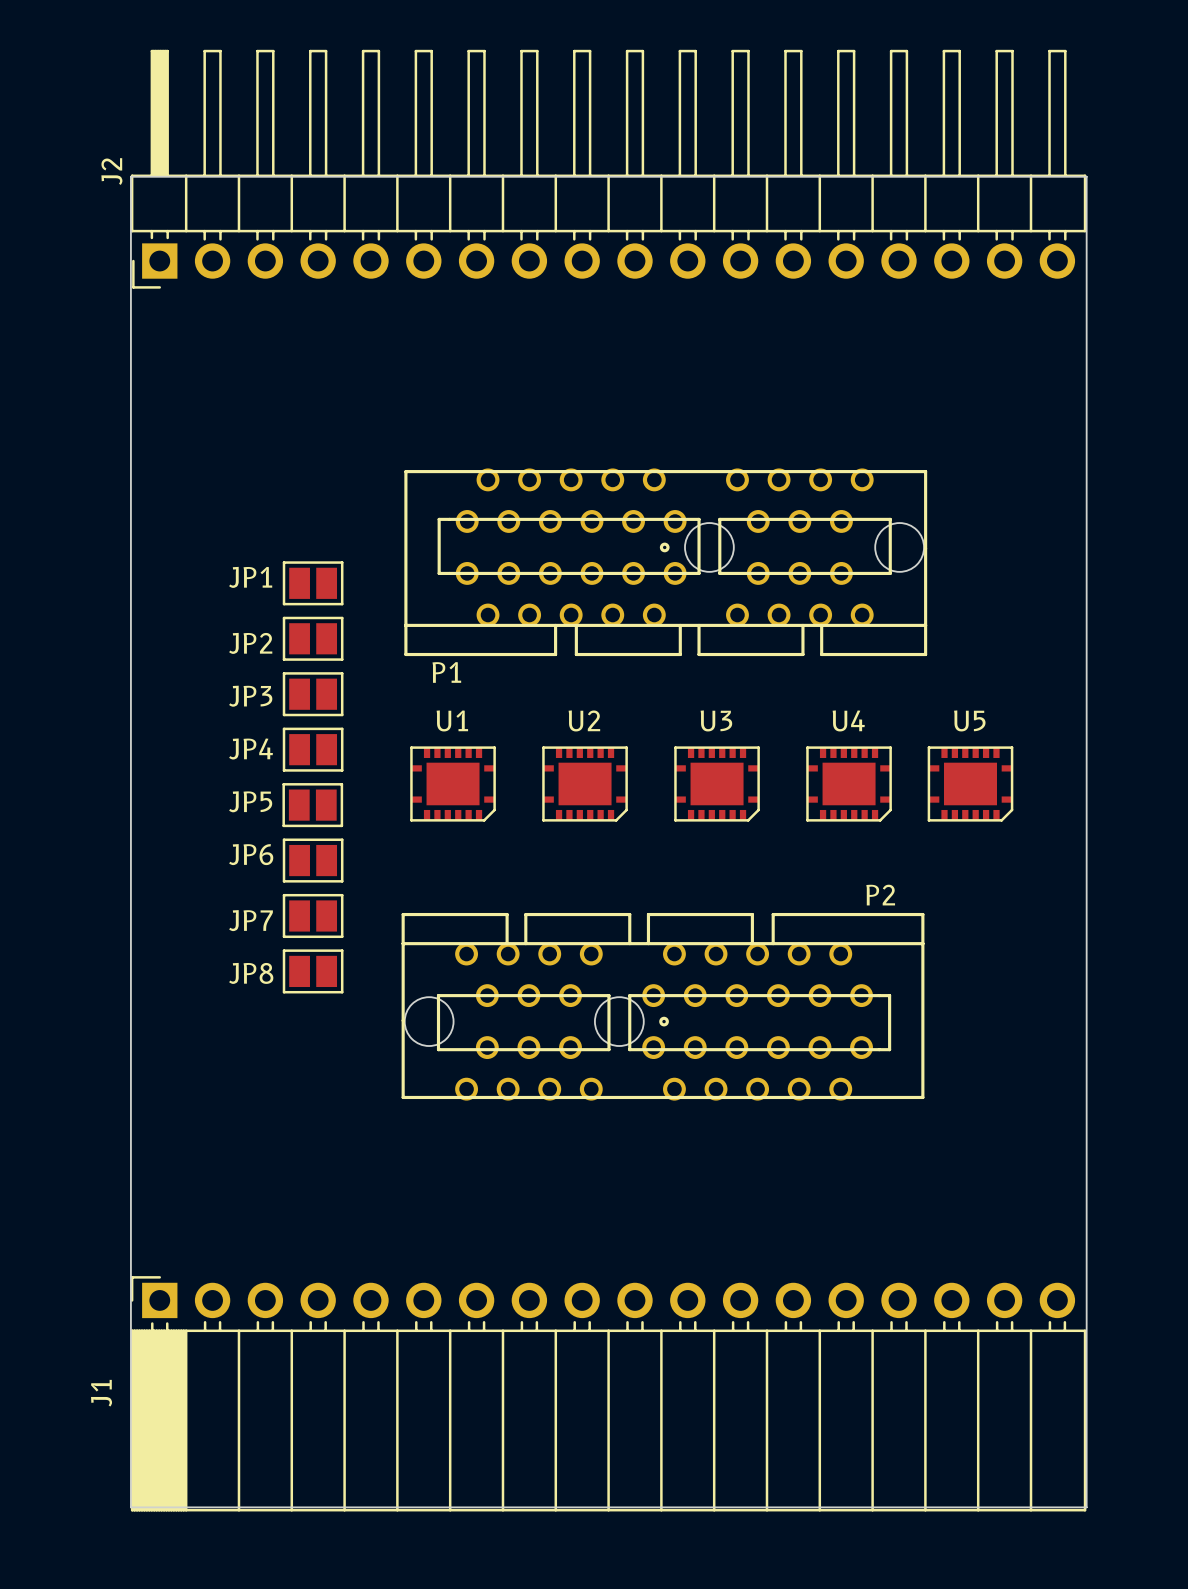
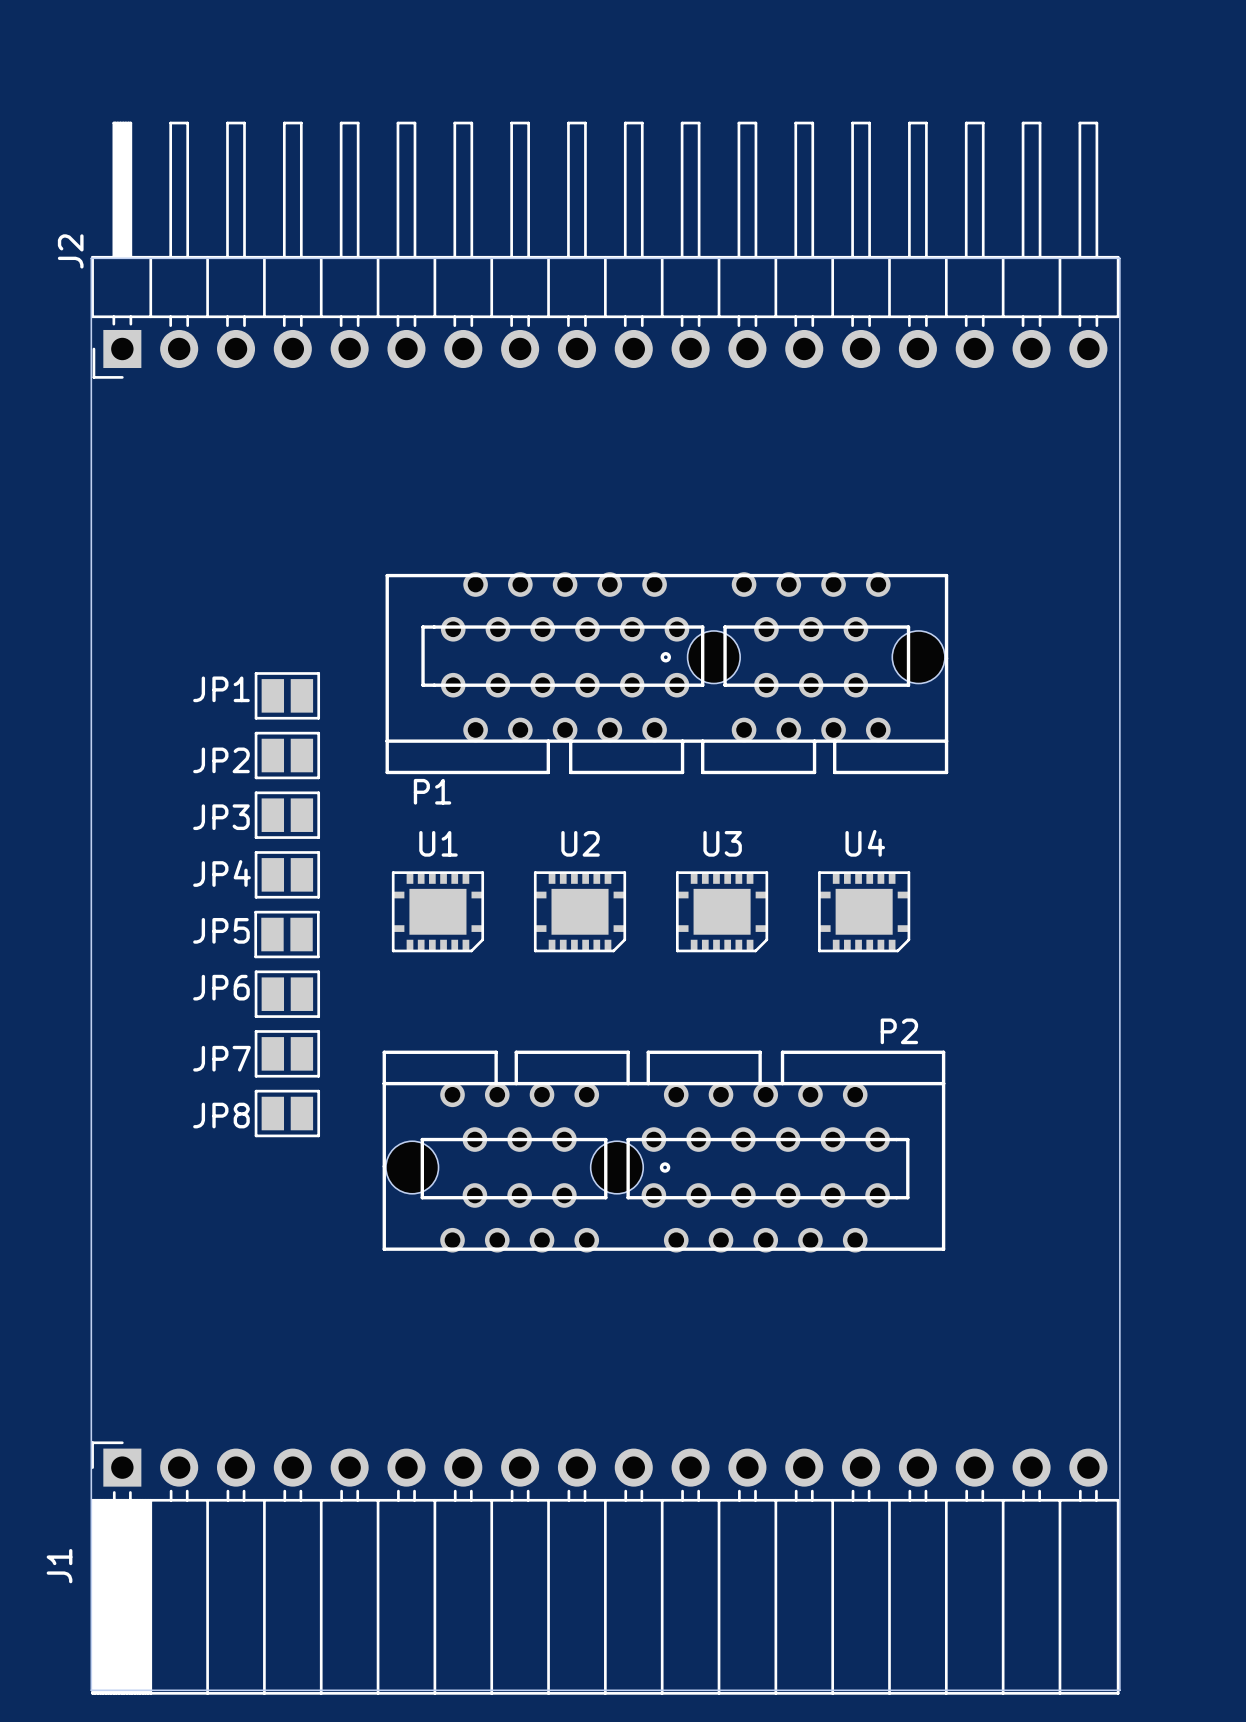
U5: (970, 783) -> none

